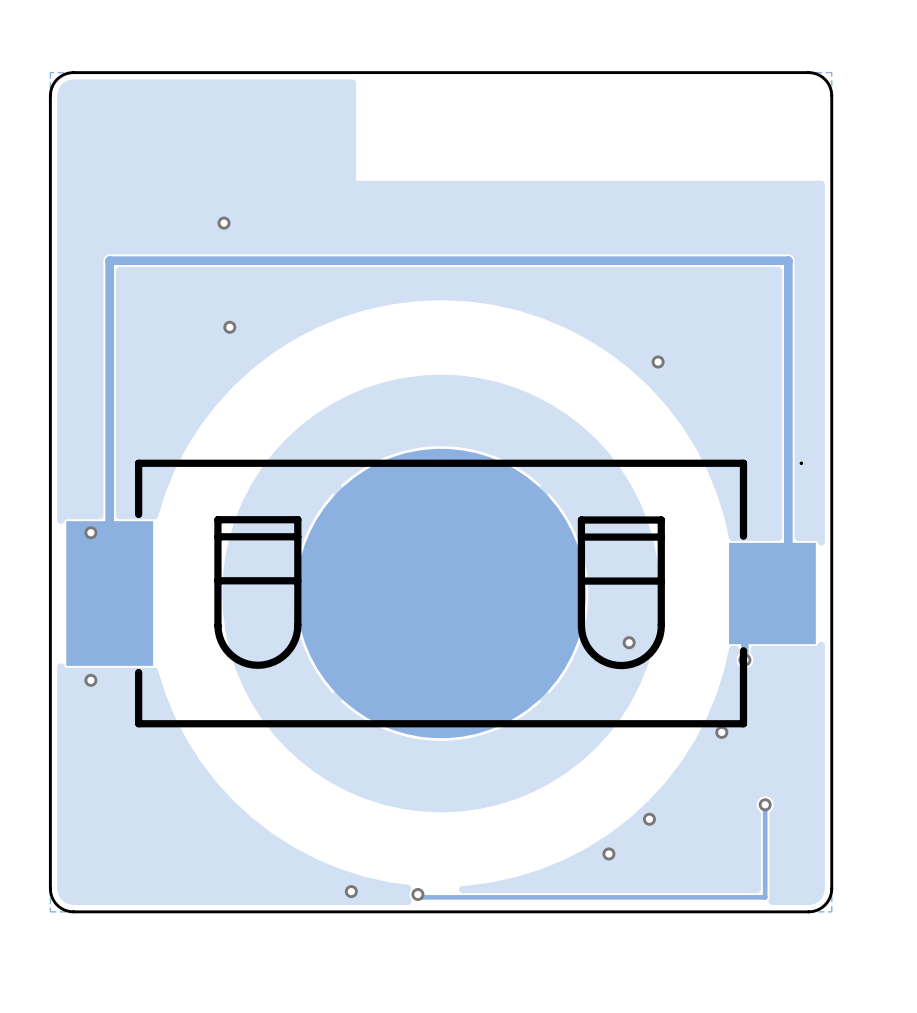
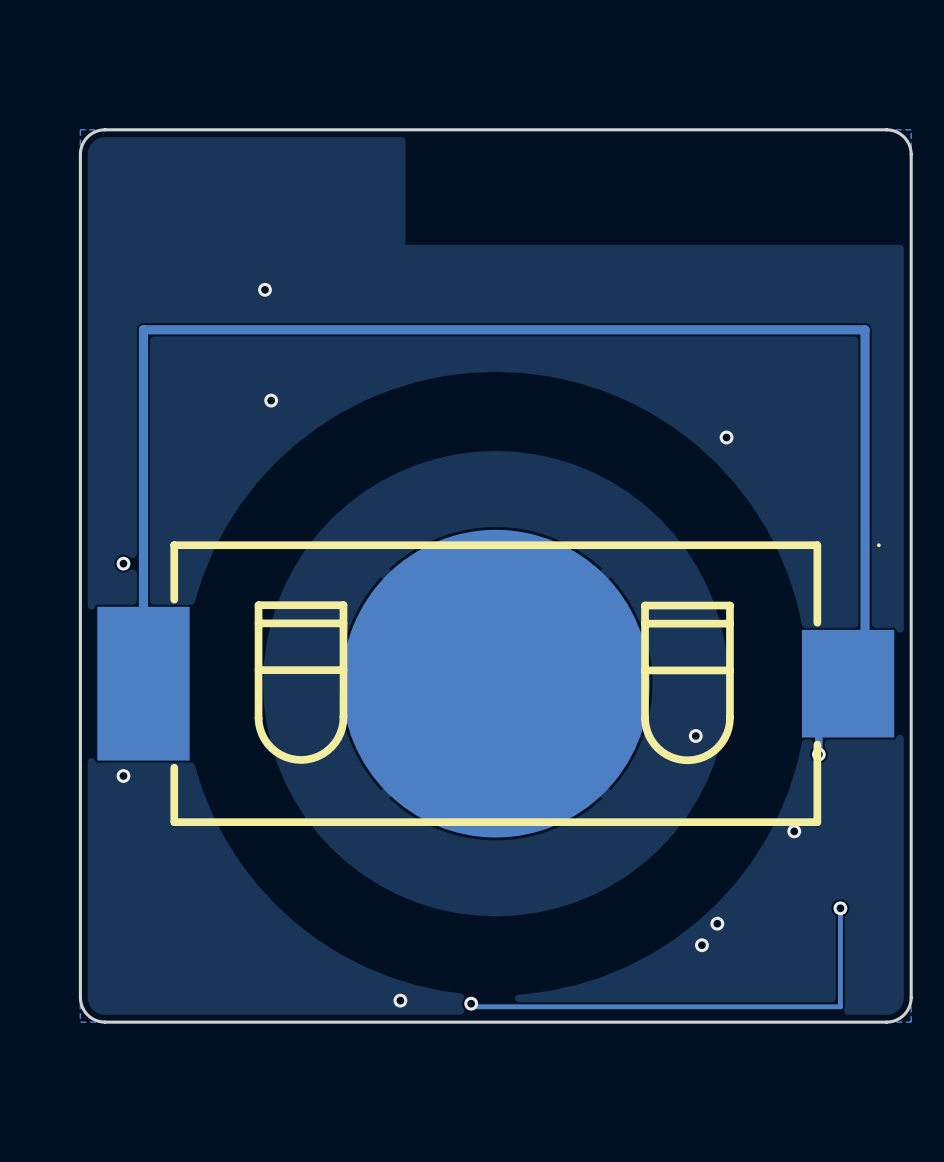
via position: (90, 532) -> (123, 563)
via position: (608, 853) -> (701, 945)

